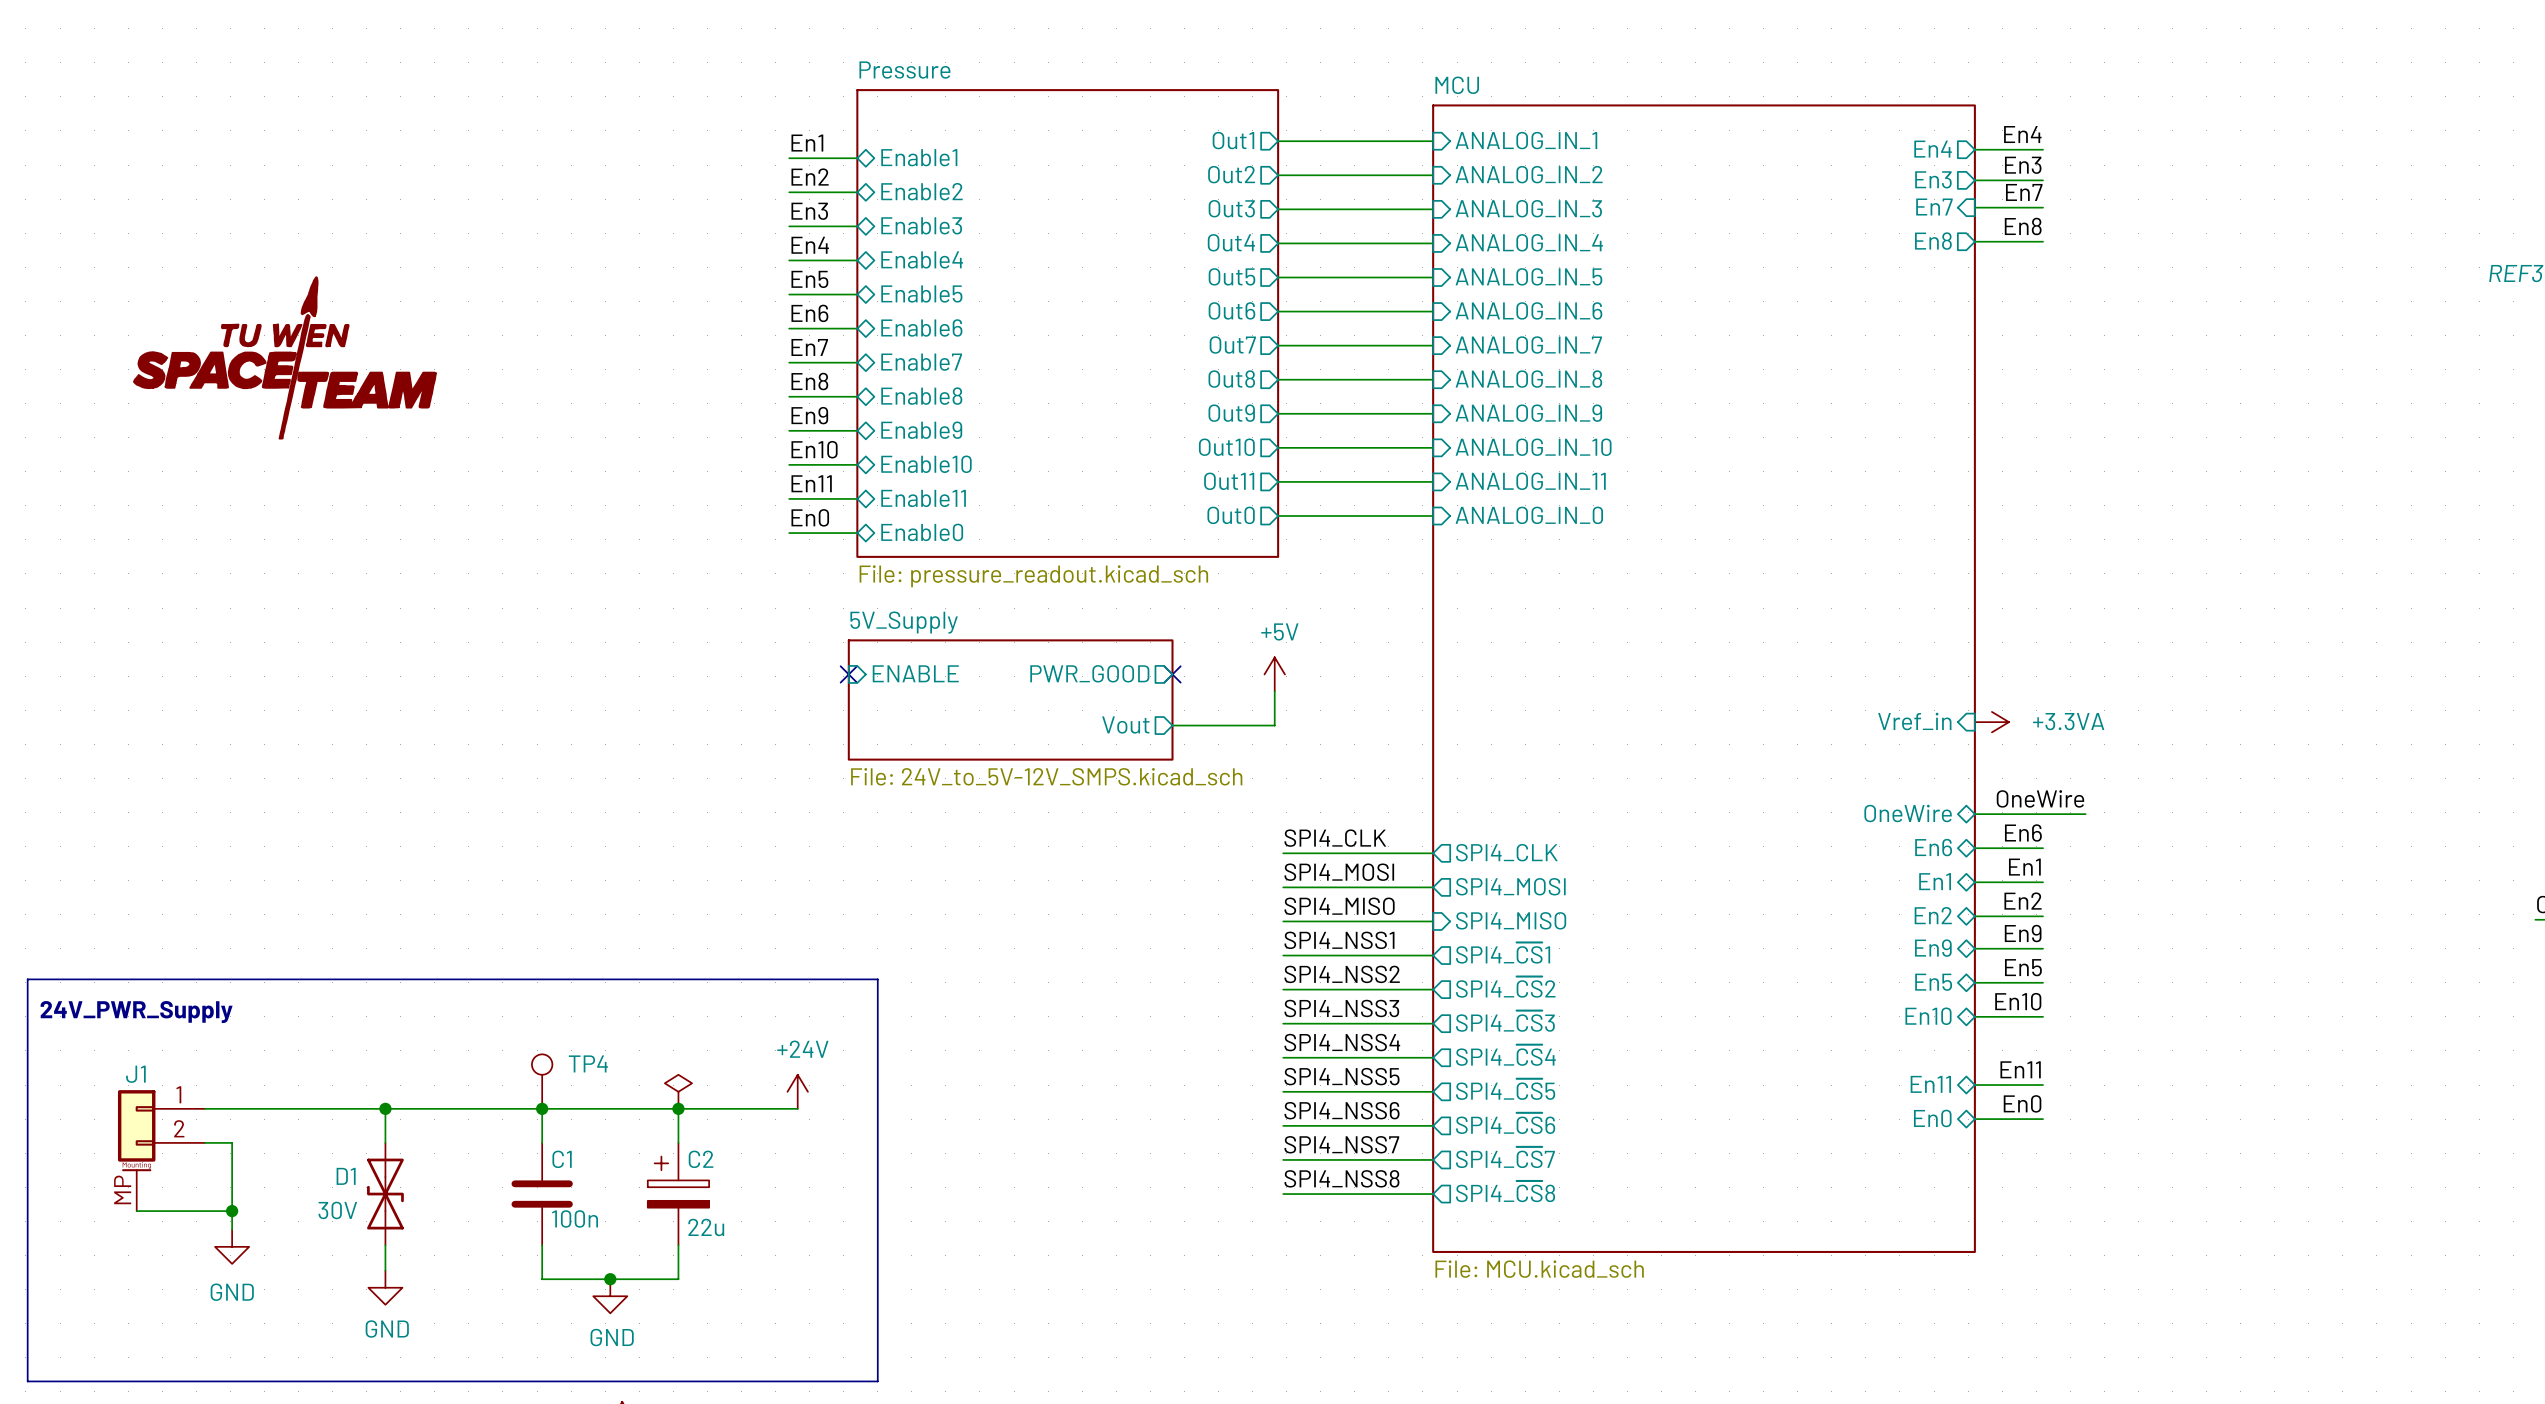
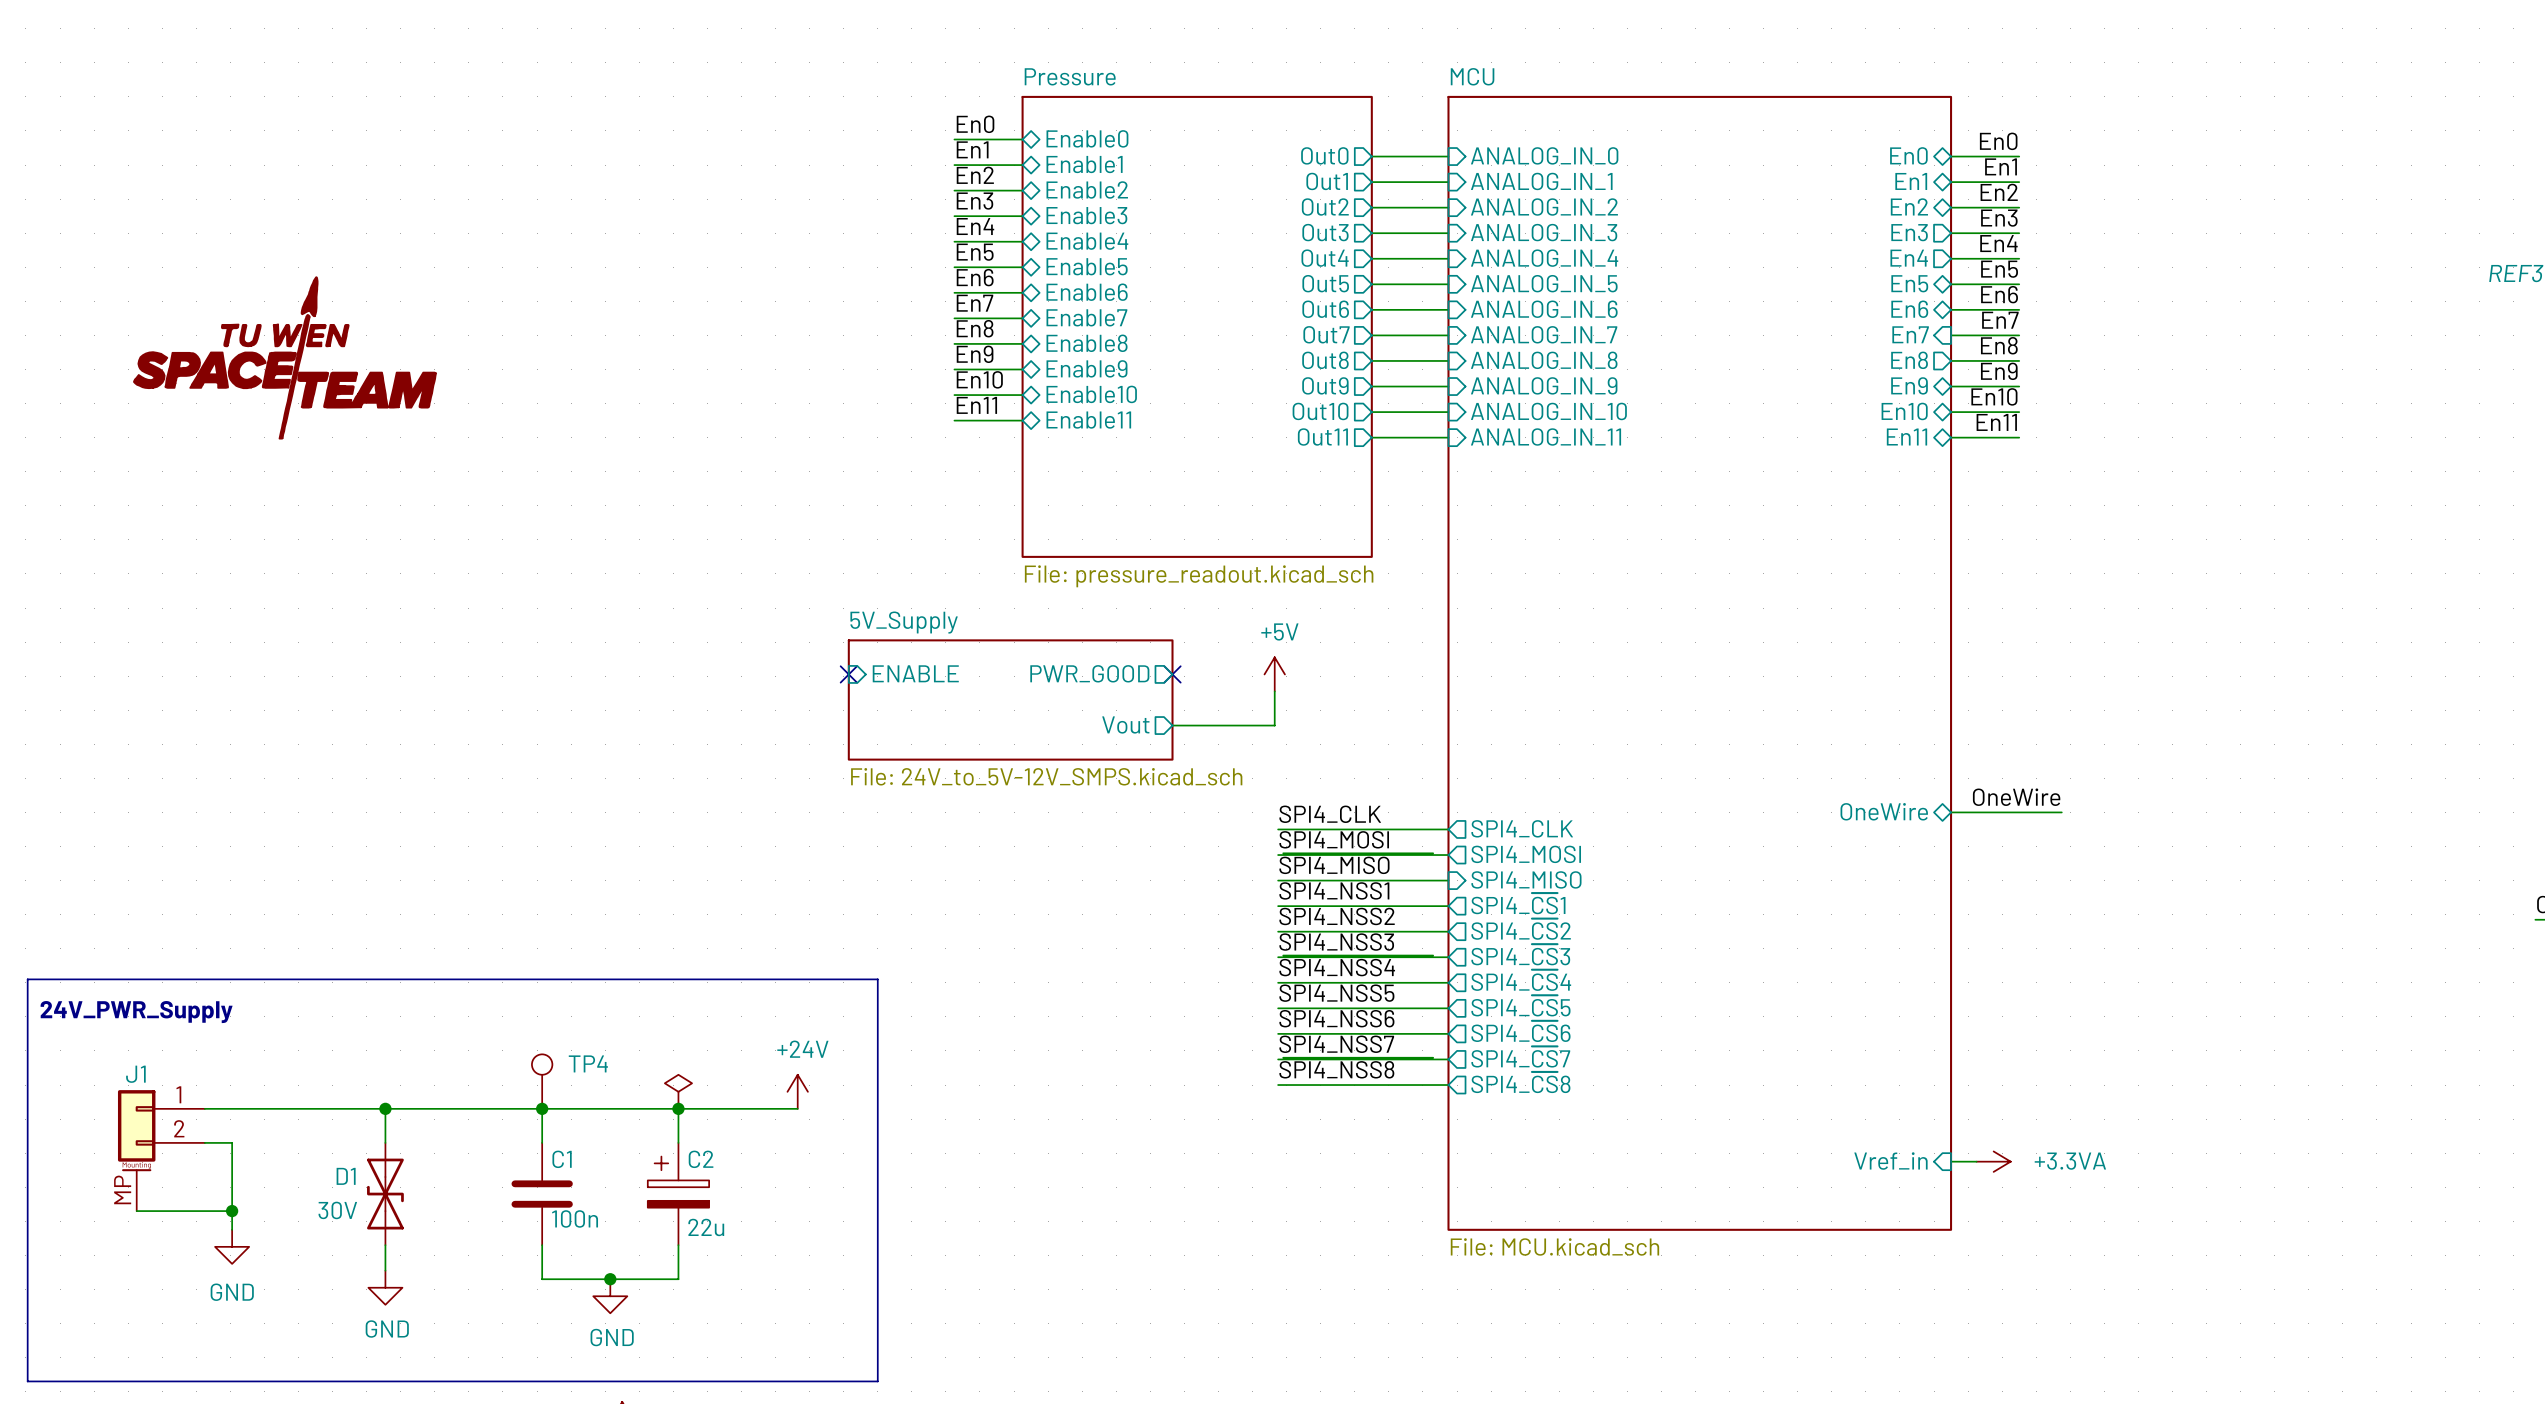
label: none -> En0 (975, 124)
label position: En4 (2022, 134) -> En4 (1998, 243)
sheet pin: none -> Enable0 (1087, 138)
wire: none -> (954, 139) (1022, 139)
sheet pin position: Out1 (1233, 140) -> Out1 (1327, 181)
sheet pin position: ANALOG_IN_1 (1526, 140) -> ANALOG_IN_1 (1541, 181)
wire: (1278, 141) (1433, 141) -> none
label: none -> En0 (1998, 141)
label position: En1 (807, 143) -> En1 (972, 149)
sheet pin position: En4 (1933, 149) -> En4 (1909, 258)
wire: (1974, 149) (2043, 149) -> (1951, 156) (2019, 156)
sheet pin: none -> Out0 (1324, 155)
sheet pin: none -> ANALOG_IN_0 (1544, 155)
sheet pin: none -> En0 (1908, 155)
wire: none -> (1371, 156) (1448, 156)
sheet pin position: Enable1 (919, 157) -> Enable1 (1084, 164)
wire: (789, 158) (857, 158) -> (954, 165) (1022, 165)
label position: En3 (2023, 165) -> En3 (1999, 218)
label: none -> En1 (2001, 166)
sheet pin position: Out2 (1231, 174) -> Out2 (1325, 207)
sheet pin position: ANALOG_IN_2 (1529, 174) -> ANALOG_IN_2 (1544, 207)
wire: (1278, 175) (1433, 175) -> none
label position: En2 (810, 177) -> En2 (975, 175)
sheet pin position: En3 (1933, 179) -> En3 (1909, 232)
wire: (1974, 180) (2043, 180) -> (1951, 182) (2019, 182)
sheet pin: none -> En1 (1911, 181)
wire: none -> (1371, 182) (1448, 182)
sheet pin position: Enable2 (922, 191) -> Enable2 (1087, 189)
wire: (789, 192) (857, 192) -> (954, 190) (1022, 190)
label: none -> En2 (1999, 192)
label position: En7 (2024, 192) -> En7 (2000, 320)
sheet pin: none -> En2 (1909, 206)
wire: none -> (1371, 207) (1448, 207)
sheet pin position: En7 (1934, 207) -> En7 (1910, 334)
wire: (2019, 207) (2043, 207) -> (1951, 207) (1974, 207)
sheet pin position: Out3 (1231, 208) -> Out3 (1325, 232)
sheet pin position: ANALOG_IN_3 (1528, 208) -> ANALOG_IN_3 (1544, 232)
wire: (1278, 209) (1433, 209) -> none
label position: En3 (809, 211) -> En3 (974, 201)
sheet pin position: Enable3 (921, 225) -> Enable3 (1086, 215)
wire: (789, 226) (857, 226) -> (954, 216) (1022, 216)
label position: En8 (2023, 226) -> En8 (1999, 345)
wire: none -> (1371, 233) (1448, 233)
sheet pin position: En8 (1933, 241) -> En8 (1909, 360)
wire: (1974, 241) (2043, 241) -> (1951, 233) (2019, 233)
sheet pin position: Out4 (1231, 242) -> Out4 (1325, 258)
sheet pin position: ANALOG_IN_4 (1529, 242) -> ANALOG_IN_4 (1544, 258)
wire: (1278, 243) (1433, 243) -> none
label position: En4 (810, 245) -> En4 (975, 226)
wire: none -> (1371, 258) (1448, 258)
wire: none -> (1951, 258) (2019, 258)
sheet pin position: Enable4 (922, 259) -> Enable4 (1087, 241)
wire: (789, 260) (857, 260) -> (954, 267) (1022, 267)
label: none -> En5 (1999, 269)
sheet pin position: Out5 (1231, 276) -> Out5 (1325, 283)
sheet pin position: ANALOG_IN_5 (1528, 276) -> ANALOG_IN_5 (1544, 283)
wire: (1278, 277) (1433, 277) -> none
label position: En5 (809, 279) -> En5 (975, 252)
sheet pin: none -> En5 (1909, 283)
wire: none -> (1371, 284) (1448, 284)
wire: none -> (1951, 284) (2019, 284)
wire: (789, 294) (857, 294) -> (954, 292) (1022, 292)
sheet pin position: Enable5 (921, 294) -> Enable5 (1087, 266)
label: none -> En6 (1999, 294)
wire: none -> (1371, 309) (1448, 309)
sheet pin: none -> En6 (1909, 309)
wire: none -> (1951, 309) (2019, 309)
sheet pin position: Out6 (1231, 310) -> Out6 (1325, 309)
sheet pin position: ANALOG_IN_6 (1528, 310) -> ANALOG_IN_6 (1544, 309)
wire: (1278, 311) (1433, 311) -> none
label position: En6 (809, 313) -> En6 (975, 277)
sheet Pressure: File: pressure_readout.kicad_sch (1067, 323) -> none
sheet Pressure: none -> File: pressure_readout.kicad_sch (1197, 326)
sheet pin position: Enable6 (921, 327) -> Enable6 (1087, 292)
wire: (789, 328) (857, 328) -> (954, 318) (1022, 318)
wire: none -> (1371, 335) (1448, 335)
wire: none -> (1951, 335) (2019, 335)
sheet pin position: Out7 (1232, 345) -> Out7 (1326, 334)
wire: (1278, 345) (1433, 345) -> none
sheet pin position: ANALOG_IN_7 (1528, 345) -> ANALOG_IN_7 (1544, 334)
label position: En7 (809, 347) -> En7 (974, 303)
wire: none -> (1371, 360) (1448, 360)
wire: none -> (1951, 360) (2019, 360)
wire: (789, 362) (857, 362) -> (954, 369) (1022, 369)
sheet pin position: Enable7 (921, 362) -> Enable7 (1086, 317)
label: none -> En9 (1999, 371)
sheet pin position: Out8 (1231, 379) -> Out8 (1325, 360)
wire: (1278, 379) (1433, 379) -> none
sheet pin position: ANALOG_IN_8 (1528, 379) -> ANALOG_IN_8 (1544, 360)
label position: En8 (809, 381) -> En8 (975, 328)
sheet pin: none -> En9 (1909, 385)
wire: none -> (1371, 386) (1448, 386)
wire: none -> (1951, 386) (2019, 386)
wire: (789, 396) (857, 396) -> (954, 395) (1022, 395)
sheet pin position: Enable8 (921, 396) -> Enable8 (1087, 343)
label: none -> En10 (1994, 396)
sheet pin: none -> En10 (1904, 411)
wire: none -> (1371, 412) (1448, 412)
wire: none -> (1951, 412) (2019, 412)
sheet pin position: Out9 (1231, 413) -> Out9 (1325, 385)
wire: (1278, 413) (1433, 413) -> none
sheet pin position: ANALOG_IN_9 (1528, 413) -> ANALOG_IN_9 (1544, 385)
label position: En9 (809, 415) -> En9 (975, 354)
label: none -> En11 (1996, 422)
wire: (789, 430) (857, 430) -> (954, 420) (1022, 420)
sheet pin position: Enable9 (921, 430) -> Enable9 (1086, 368)
wire: none -> (1371, 437) (1448, 437)
sheet pin: none -> En11 (1906, 437)
wire: none -> (1951, 437) (2019, 437)
sheet pin position: Out10 (1226, 447) -> Out10 (1320, 411)
wire: (1278, 447) (1433, 447) -> none
sheet pin position: ANALOG_IN_10 (1533, 447) -> ANALOG_IN_10 (1548, 411)
label position: En10 (814, 449) -> En10 (979, 379)
wire: (789, 464) (857, 464) -> (954, 343) (1022, 343)
sheet pin position: Enable10 (926, 464) -> Enable10 (1091, 394)
sheet pin position: Out11 (1229, 481) -> Out11 (1322, 437)
wire: (1278, 481) (1433, 481) -> none
sheet pin position: ANALOG_IN_11 (1530, 481) -> ANALOG_IN_11 (1546, 437)
label position: En11 (811, 483) -> En11 (976, 405)
wire: (789, 498) (857, 498) -> (954, 241) (1022, 241)
sheet pin position: Enable11 (923, 498) -> Enable11 (1088, 420)
sheet pin: Out0 (1231, 515) -> none
sheet pin: ANALOG_IN_0 (1529, 515) -> none
wire: (1278, 516) (1433, 516) -> none
label: En0 (810, 517) -> none
sheet pin: Enable0 (922, 532) -> none
wire: (789, 533) (857, 533) -> none
sheet MCU: none -> File: MCU.kicad_sch (1699, 663)
sheet MCU: File: MCU.kicad_sch (1704, 678) -> none
sheet pin: Vref_in (1914, 721) -> none
power symbol: +3.3VA (1991, 722) -> none
label position: OneWire (2040, 798) -> OneWire (2016, 797)
sheet pin position: OneWire (1908, 813) -> OneWire (1884, 811)
wire: (1974, 814) (2085, 814) -> (1951, 812) (2061, 812)
wire: none -> (1278, 829) (1448, 829)
label: En6 (2023, 832) -> none
label position: SPI4_CLK (1335, 838) -> SPI4_CLK (1330, 814)
sheet pin: En6 (1933, 847) -> none
wire: (1974, 848) (2043, 848) -> none
sheet pin position: SPI4_CLK (1506, 852) -> SPI4_CLK (1522, 828)
wire: none -> (1278, 855) (1448, 855)
label: En1 (2024, 867) -> none
label position: SPI4_MOSI (1339, 872) -> SPI4_MOSI (1334, 839)
wire: none -> (1278, 880) (1448, 880)
sheet pin: En1 (1935, 881) -> none
wire: (1974, 882) (2043, 882) -> none
sheet pin position: SPI4_MOSI (1510, 886) -> SPI4_MOSI (1526, 854)
wire: (1283, 887) (1433, 887) -> none
label: En2 (2023, 901) -> none
wire: none -> (1278, 906) (1448, 906)
label position: SPI4_MISO (1339, 906) -> SPI4_MISO (1334, 865)
sheet pin: En2 (1933, 915) -> none
wire: (1974, 916) (2043, 916) -> none
sheet pin position: SPI4_MISO (1511, 920) -> SPI4_MISO (1526, 879)
wire: (1283, 921) (1433, 921) -> none
wire: none -> (1278, 931) (1448, 931)
label: En9 (2023, 933) -> none
label position: SPI4_NSS1 (1339, 940) -> SPI4_NSS1 (1334, 890)
sheet pin: En9 (1933, 948) -> none
wire: (1974, 948) (2043, 948) -> none
sheet pin position: SPI4_~{CS}1 (1503, 953) -> SPI4_~{CS}1 (1518, 903)
wire: none -> (1278, 957) (1448, 957)
label: En5 (2023, 967) -> none
label position: SPI4_NSS2 (1342, 974) -> SPI4_NSS2 (1337, 916)
wire: none -> (1278, 982) (1448, 982)
sheet pin: En5 (1933, 982) -> none
wire: (1974, 982) (2043, 982) -> none
sheet pin position: SPI4_~{CS}2 (1505, 987) -> SPI4_~{CS}2 (1521, 929)
wire: (1283, 989) (1433, 989) -> none
label: En10 (2018, 1001) -> none
wire: none -> (1278, 1008) (1448, 1008)
label position: SPI4_NSS3 (1341, 1008) -> SPI4_NSS3 (1336, 942)
sheet pin: En10 (1928, 1016) -> none
wire: (1974, 1016) (2043, 1016) -> none
sheet pin position: SPI4_~{CS}3 (1505, 1021) -> SPI4_~{CS}3 (1520, 954)
wire: (1283, 1023) (1433, 1023) -> none
wire: none -> (1278, 1033) (1448, 1033)
label position: SPI4_NSS4 (1342, 1042) -> SPI4_NSS4 (1337, 967)
sheet pin position: SPI4_~{CS}4 (1505, 1055) -> SPI4_~{CS}4 (1521, 980)
wire: none -> (1278, 1059) (1448, 1059)
label: En11 (2020, 1069) -> none
label position: SPI4_NSS5 (1342, 1076) -> SPI4_NSS5 (1336, 993)
sheet pin: En11 (1930, 1084) -> none
wire: none -> (1278, 1085) (1448, 1085)
wire: (1974, 1085) (2043, 1085) -> none
sheet pin position: SPI4_~{CS}5 (1505, 1089) -> SPI4_~{CS}5 (1520, 1005)
wire: (1283, 1091) (1433, 1091) -> none
label: En0 (2022, 1103) -> none
label position: SPI4_NSS6 (1342, 1110) -> SPI4_NSS6 (1336, 1018)
sheet pin: En0 (1932, 1118) -> none
wire: (1974, 1119) (2043, 1119) -> none
sheet pin position: SPI4_~{CS}6 (1505, 1123) -> SPI4_~{CS}6 (1520, 1031)
wire: (1283, 1125) (1433, 1125) -> none
label position: SPI4_NSS7 (1341, 1144) -> SPI4_NSS7 (1336, 1044)
sheet pin position: SPI4_~{CS}7 (1505, 1157) -> SPI4_~{CS}7 (1520, 1056)
wire: (1283, 1159) (1433, 1159) -> none
sheet pin: none -> Vref_in (1890, 1161)
wire: none -> (1951, 1161) (1976, 1161)
power symbol: none -> +3.3VA (1993, 1161)
label position: SPI4_NSS8 (1341, 1178) -> SPI4_NSS8 (1336, 1069)
sheet pin position: SPI4_~{CS}8 (1505, 1191) -> SPI4_~{CS}8 (1520, 1082)
wire: (1283, 1194) (1433, 1194) -> none

